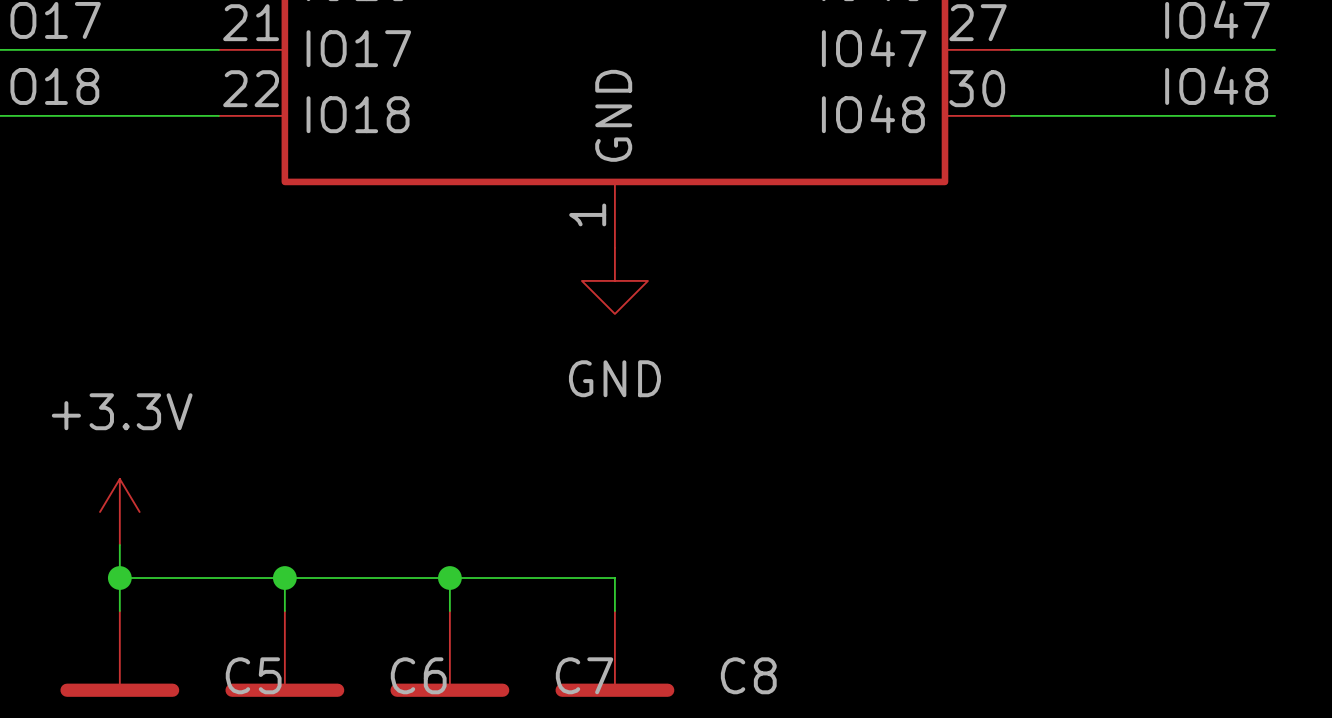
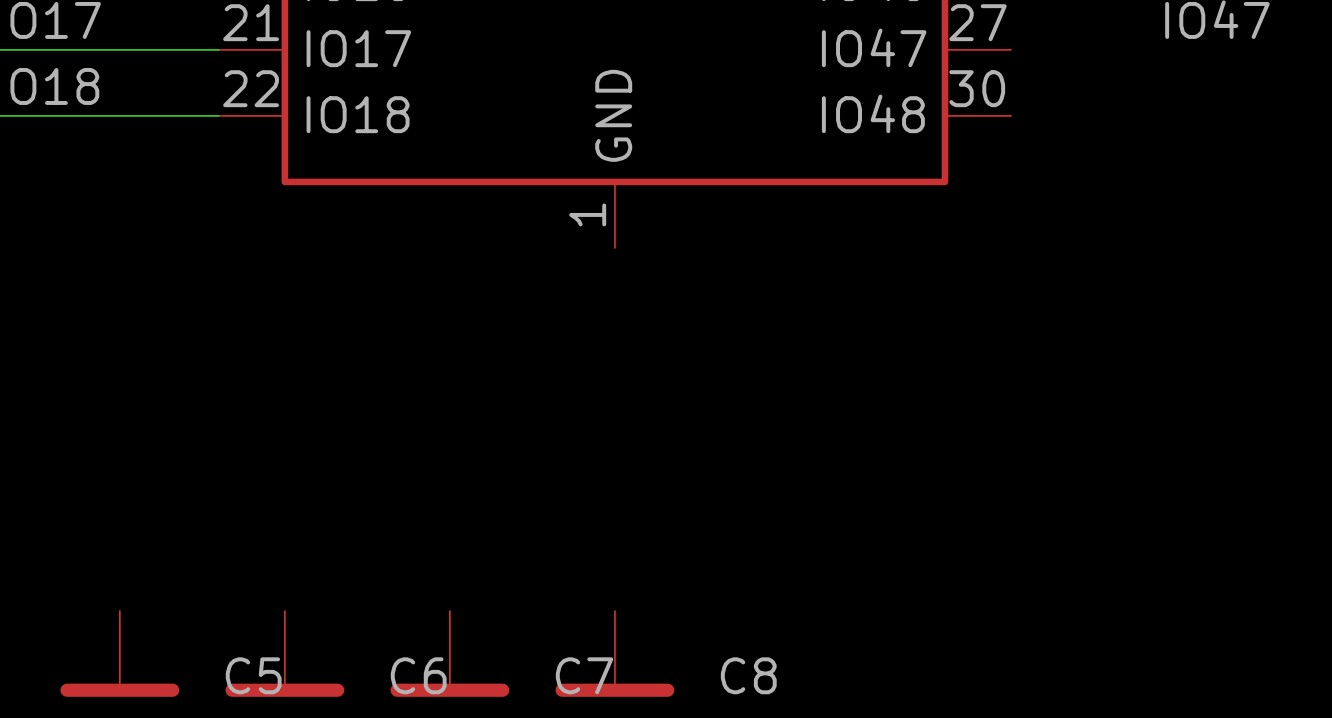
wire: (1011, 49) (1275, 49) -> none
label: IO48 (1216, 85) -> none
wire: (1011, 115) (1275, 115) -> none
power symbol: GND (614, 280) -> none
power symbol: +3.3V (119, 511) -> none
wire: (119, 545) (119, 611) -> none
wire: (119, 578) (614, 578) (614, 611) -> none
junction: (119, 578) -> none
wire: (284, 578) (284, 611) -> none
junction: (284, 578) -> none
wire: (449, 578) (449, 611) -> none
junction: (449, 578) -> none

